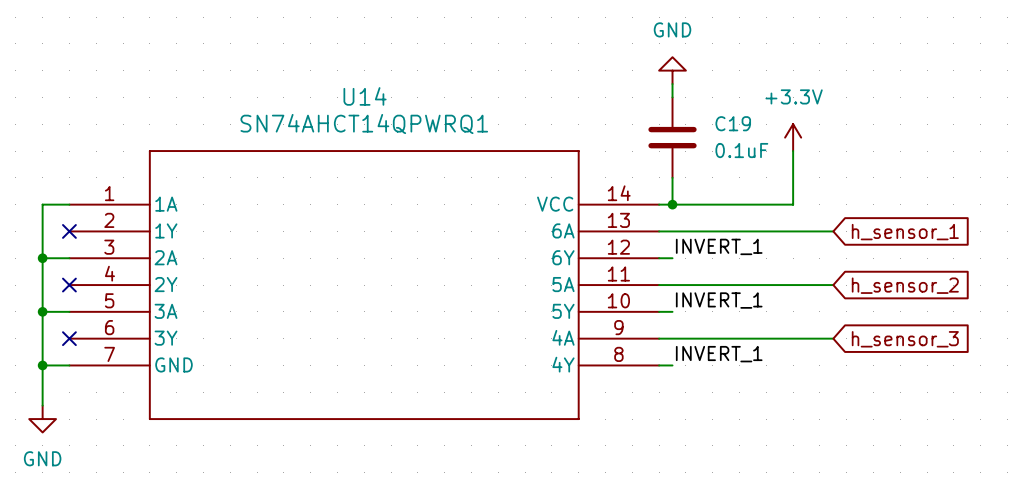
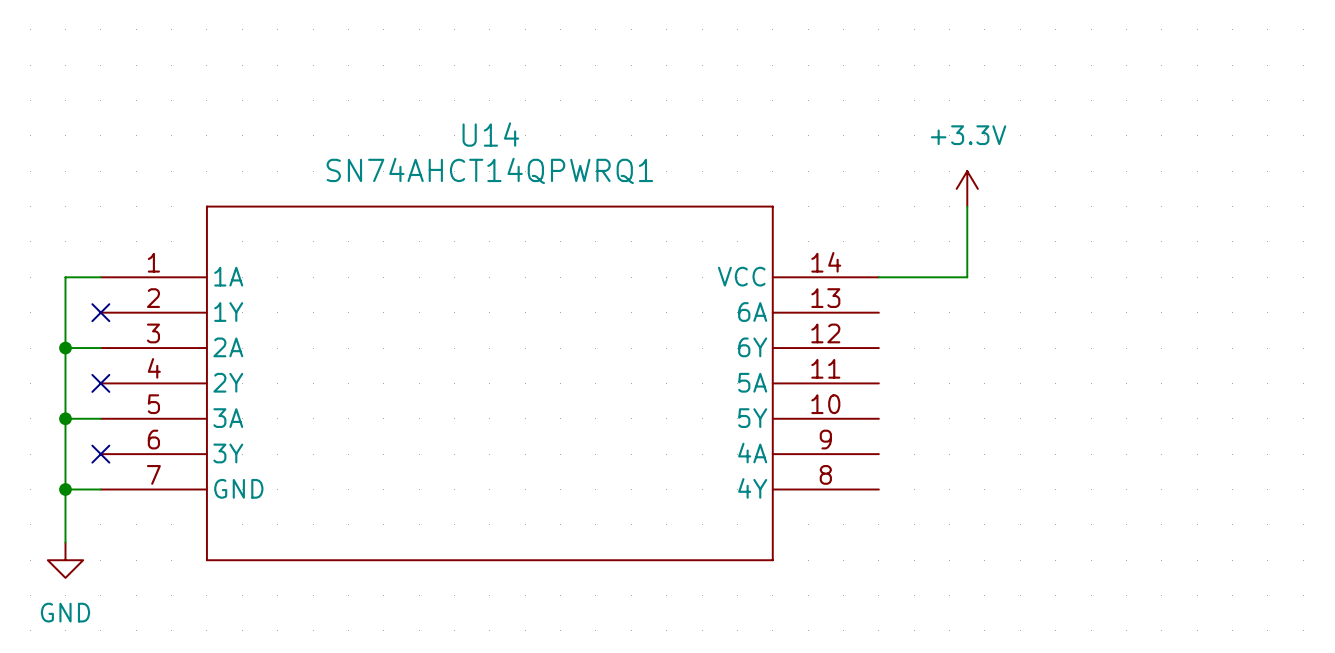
power symbol: GND (672, 70) -> none
wire: (672, 84) (672, 97) -> none
C19: 0.1uF (672, 137) -> none
power symbol position: +3.3V (793, 137) -> +3.3V (967, 188)
wire: (793, 151) (793, 204) (726, 204) -> (967, 206) (967, 277)
wire: (672, 177) (672, 204) -> none
junction: (672, 204) -> none
wire: (659, 231) (833, 231) -> none
global label: h_sensor_1 (905, 232) -> none
label: INVERT_1 (719, 246) -> none
wire: (659, 258) (672, 258) -> none
wire: (659, 285) (833, 285) -> none
global label: h_sensor_2 (905, 285) -> none
label: INVERT_1 (719, 300) -> none
wire: (659, 311) (672, 311) -> none
wire: (659, 338) (833, 338) -> none
global label: h_sensor_3 (905, 339) -> none
label: INVERT_1 (719, 354) -> none
wire: (659, 365) (672, 365) -> none

